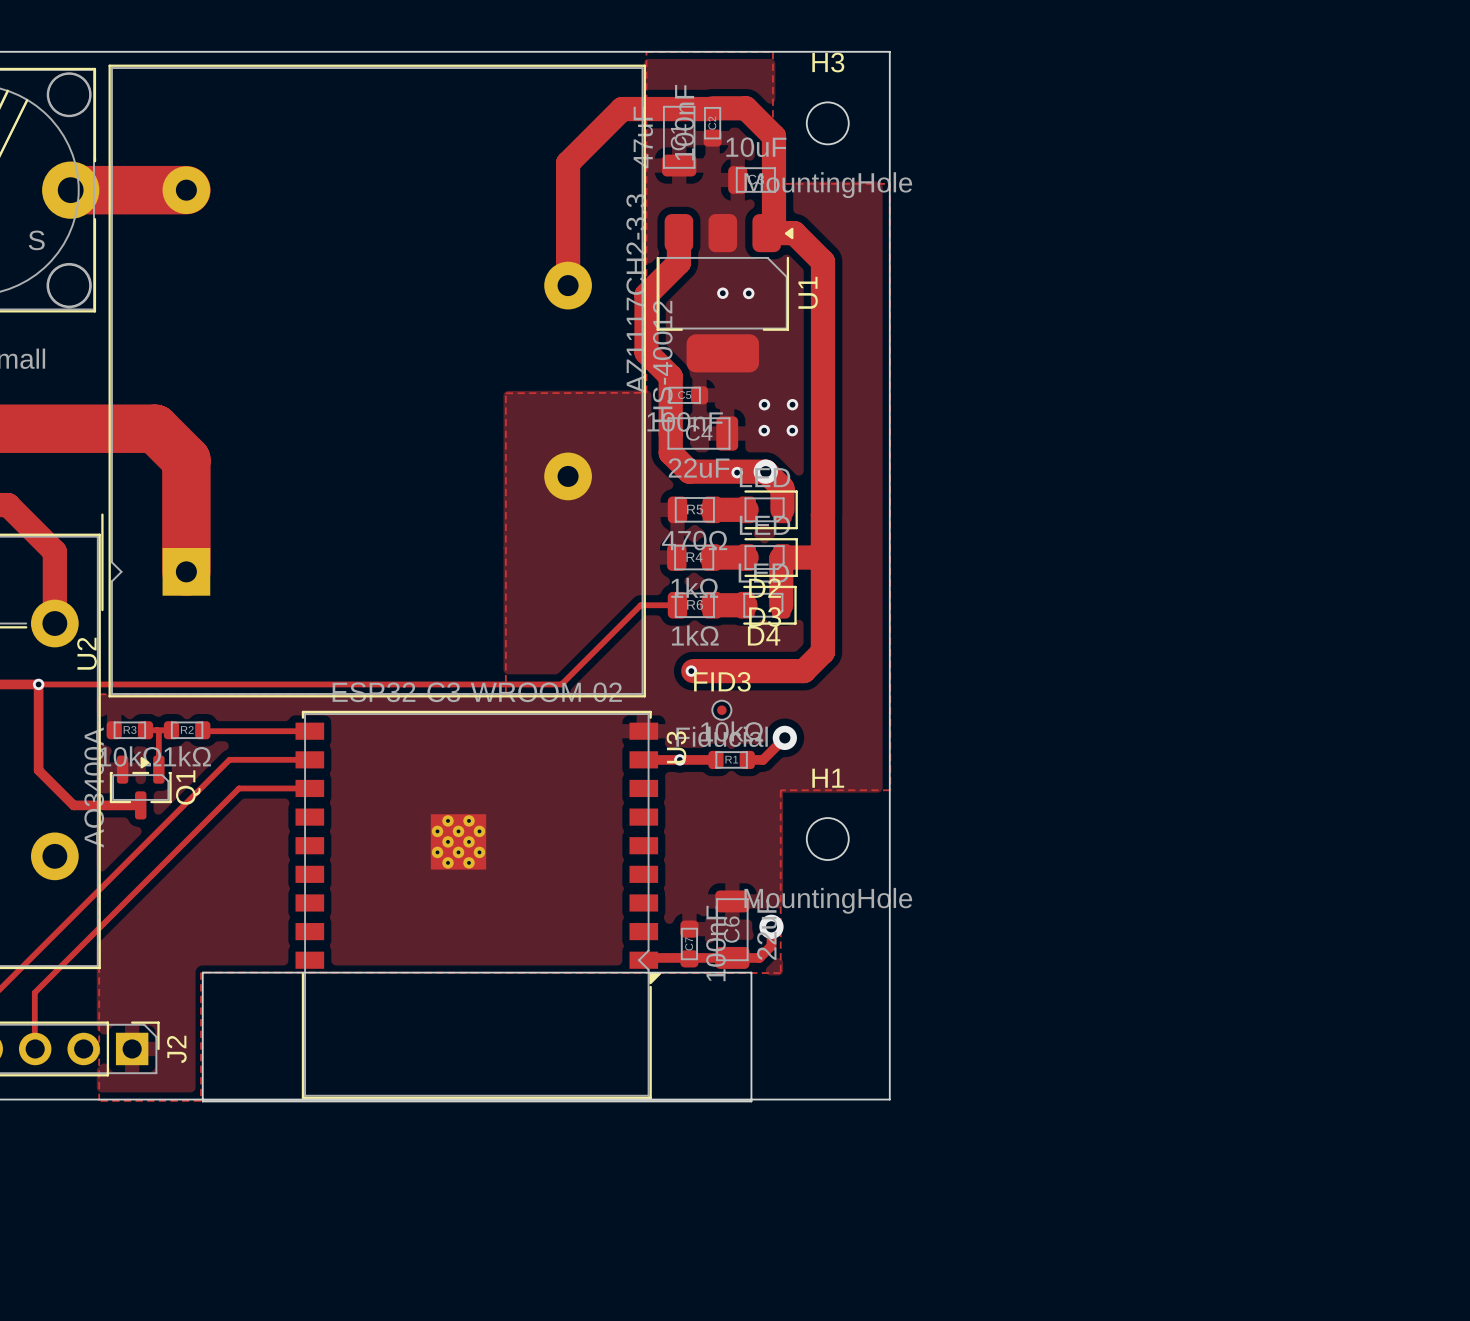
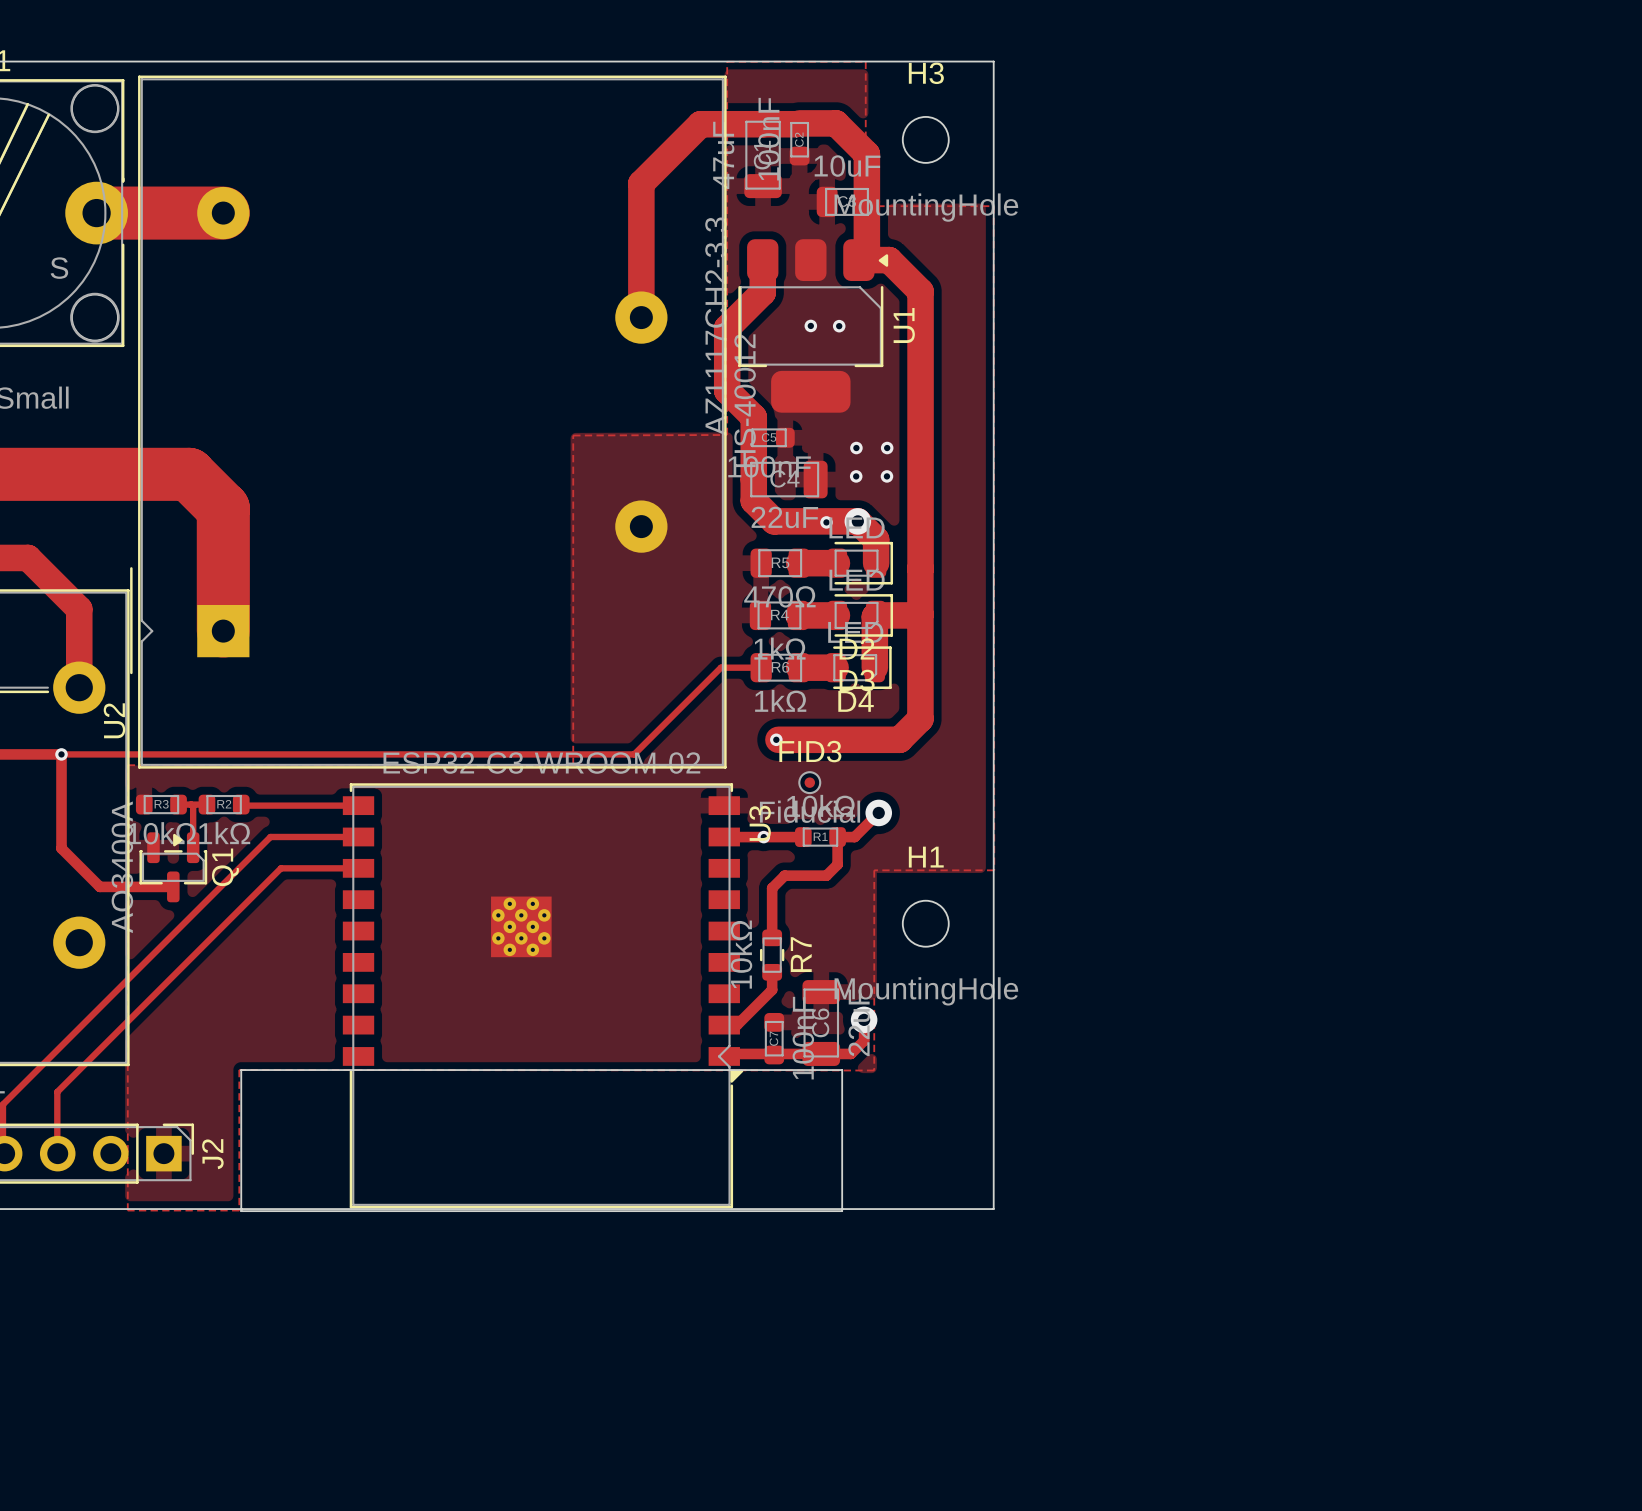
track: none -> (837, 837) (837, 864) (826, 875) (784, 875) (772, 888) (772, 937)
R7: none -> 10kΩ (772, 955)
track: none -> (772, 972) (772, 989) (736, 1025) (724, 1025)

